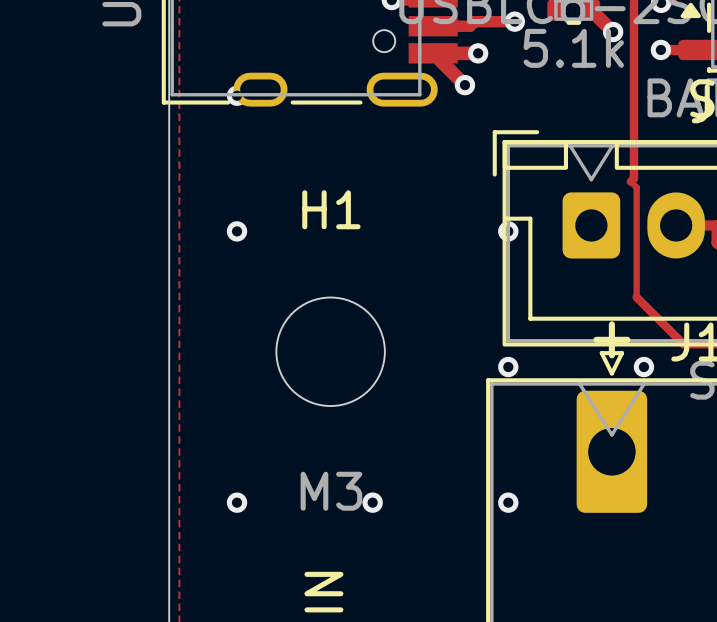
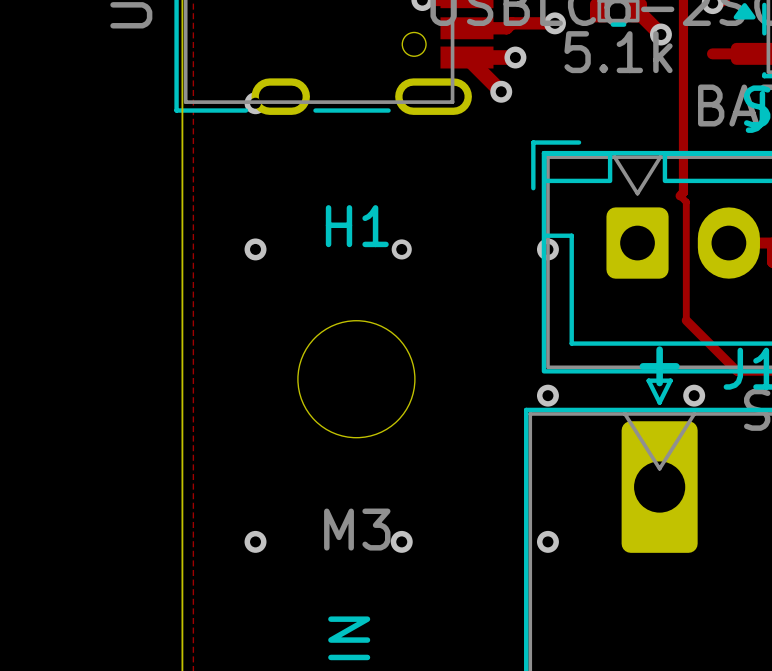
via: (660, 49) -> none
via: none -> (401, 249)

